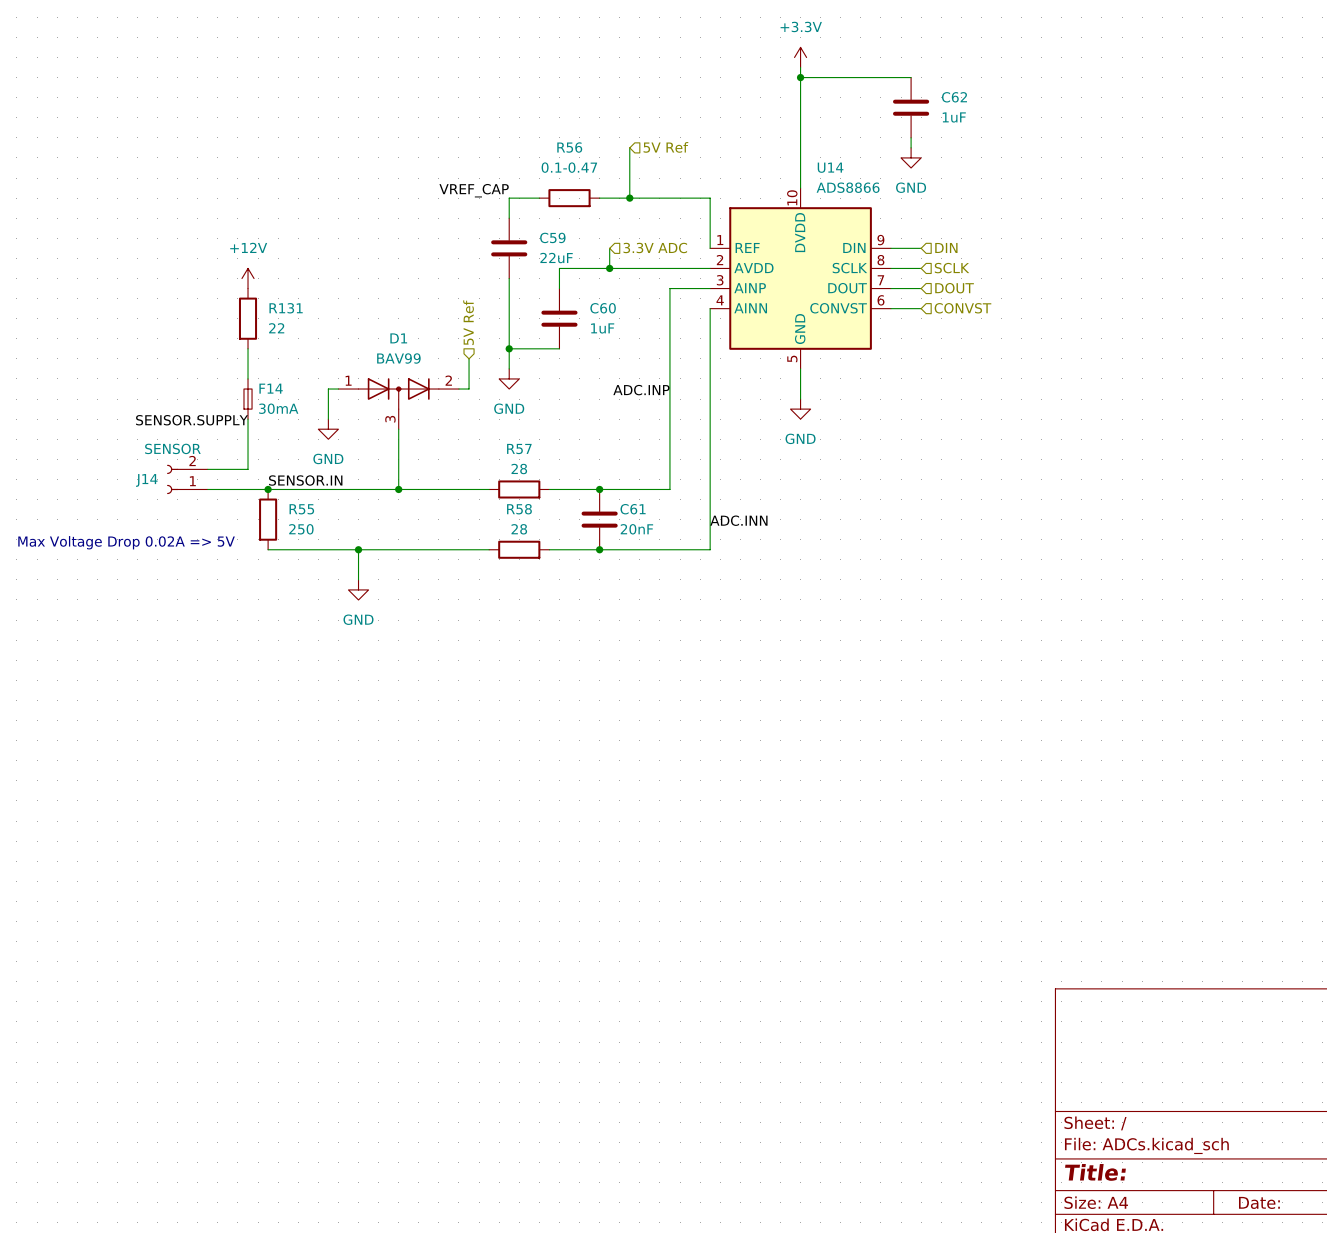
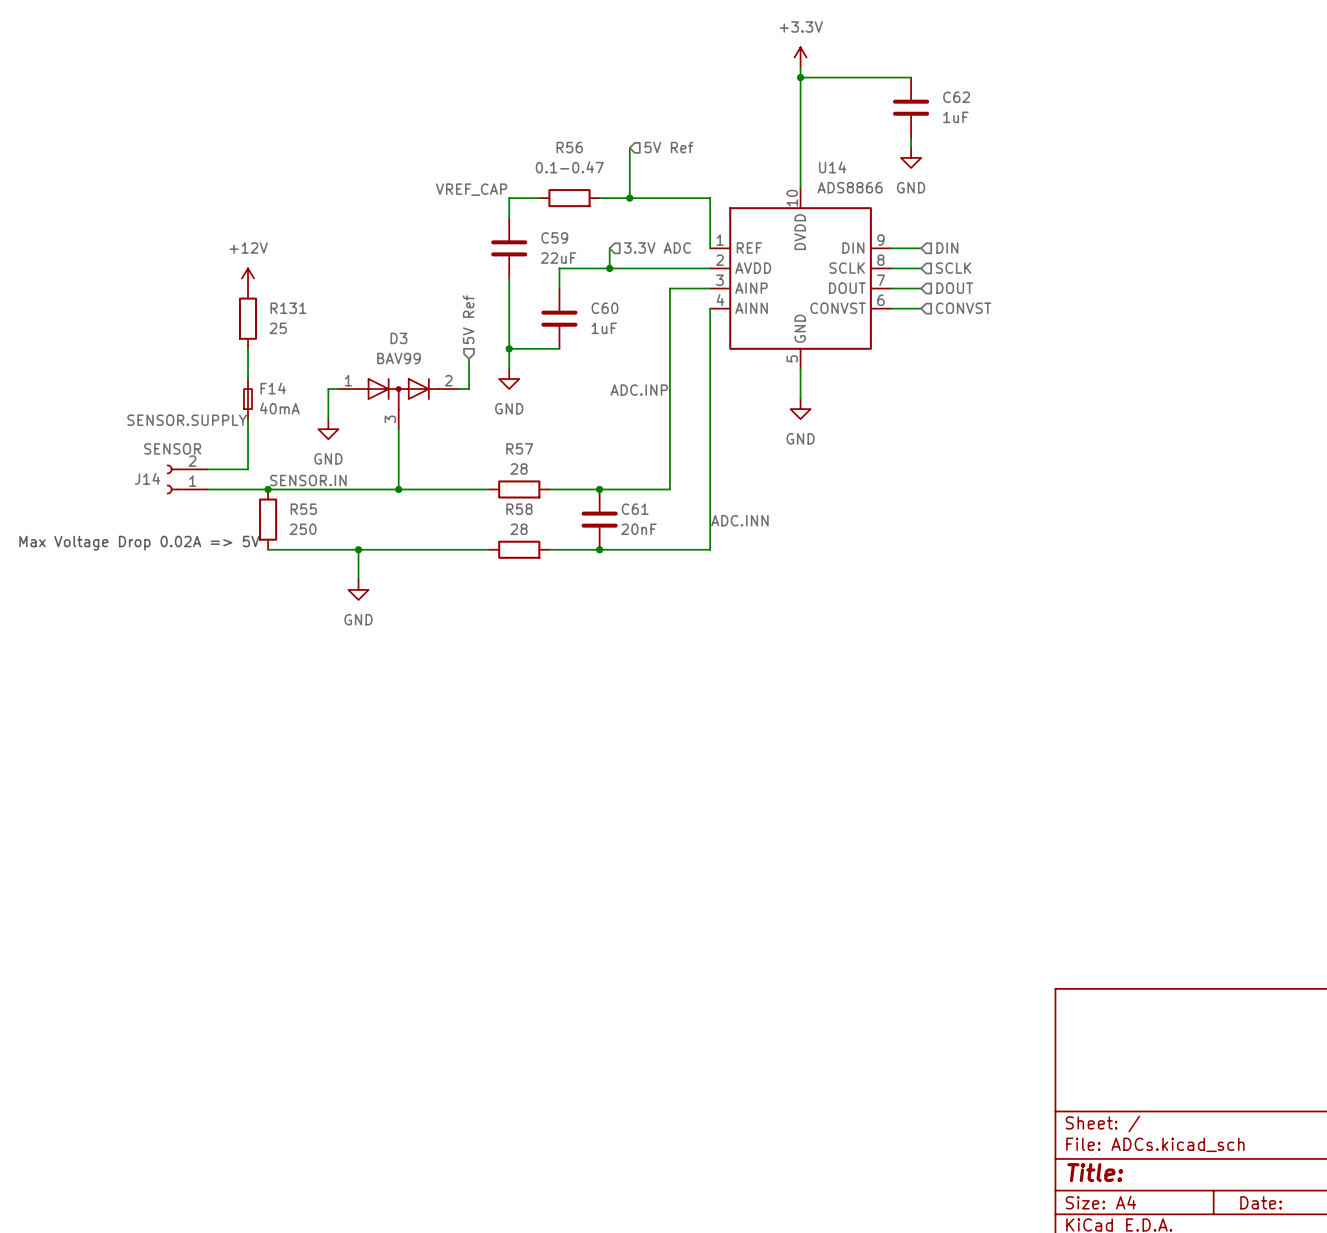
R131 value: 22 (276, 328) -> 25 (278, 328)
D1 name: D1 (398, 338) -> D3 (398, 338)
F14 value: 30mA (278, 408) -> 40mA (279, 408)

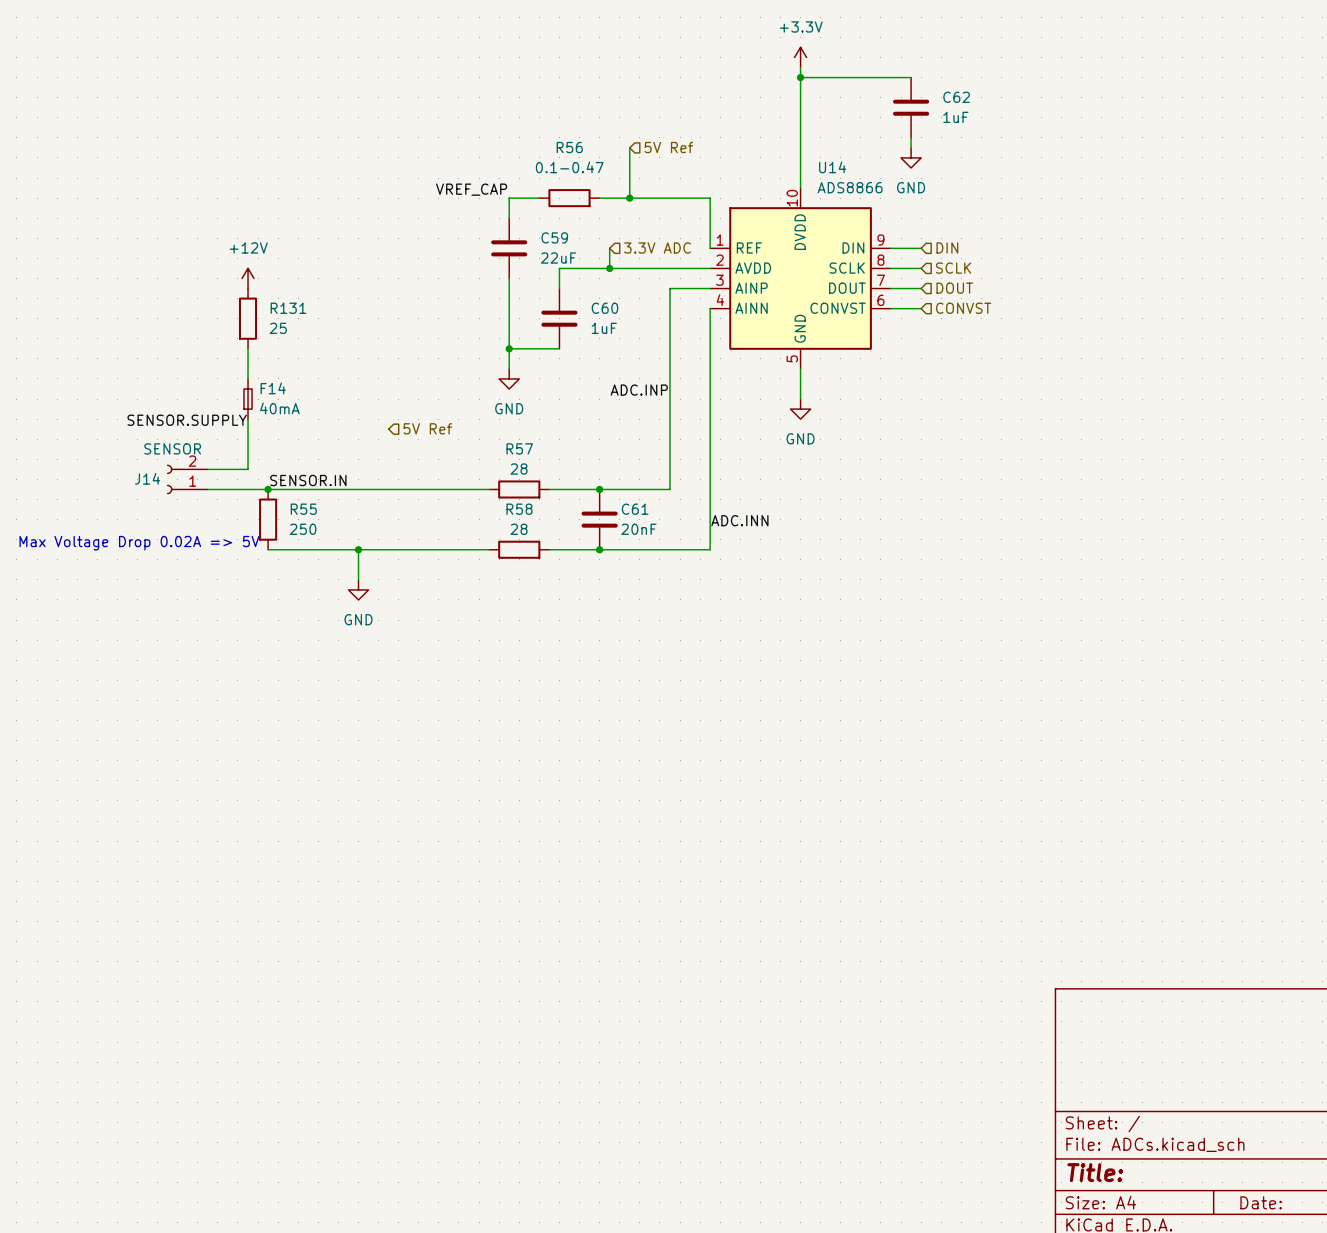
hierarchical label rotation: 0° (468, 319) -> 90° clockwise (427, 428)
hierarchical label position: 5V Ref (468, 319) -> 5V Ref (427, 428)
wire: (469, 358) (469, 389) (458, 389) -> none
wire: (338, 389) (328, 389) (328, 419) -> none
D3: BAV99 (398, 403) -> none
power symbol: GND (328, 429) -> none
wire: (398, 429) (398, 489) -> none
junction: (398, 489) -> none

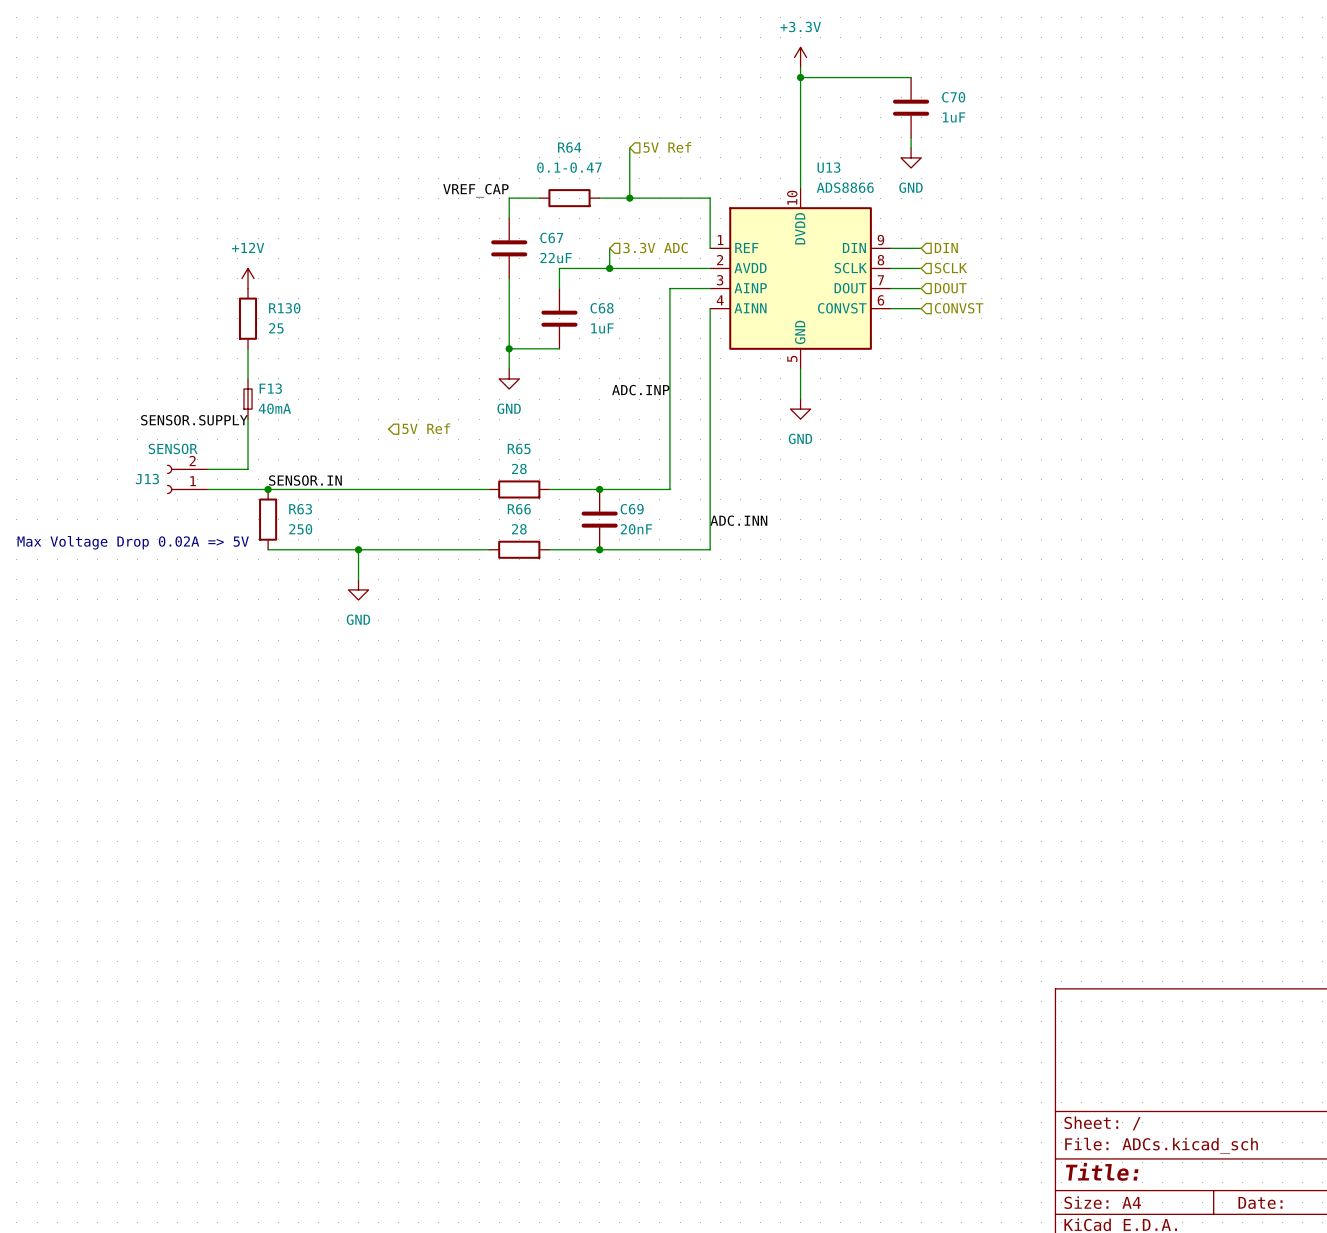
C62 name: C62 (956, 97) -> C70 (953, 97)
R56 name: R56 (569, 147) -> R64 (569, 147)
U14 name: U14 (832, 167) -> U13 (828, 167)
C59 name: C59 (554, 237) -> C67 (551, 237)
R131 name: R131 (288, 308) -> R130 (284, 308)
C60 name: C60 (604, 308) -> C68 (602, 308)
F14 name: F14 (273, 388) -> F13 (270, 388)
R57 name: R57 (519, 448) -> R65 (519, 448)
J14 name: J14 (147, 478) -> J13 (147, 479)
R55 name: R55 (303, 509) -> R63 (300, 509)
R58 name: R58 (519, 509) -> R66 (519, 509)
C61 name: C61 (635, 509) -> C69 (632, 509)

